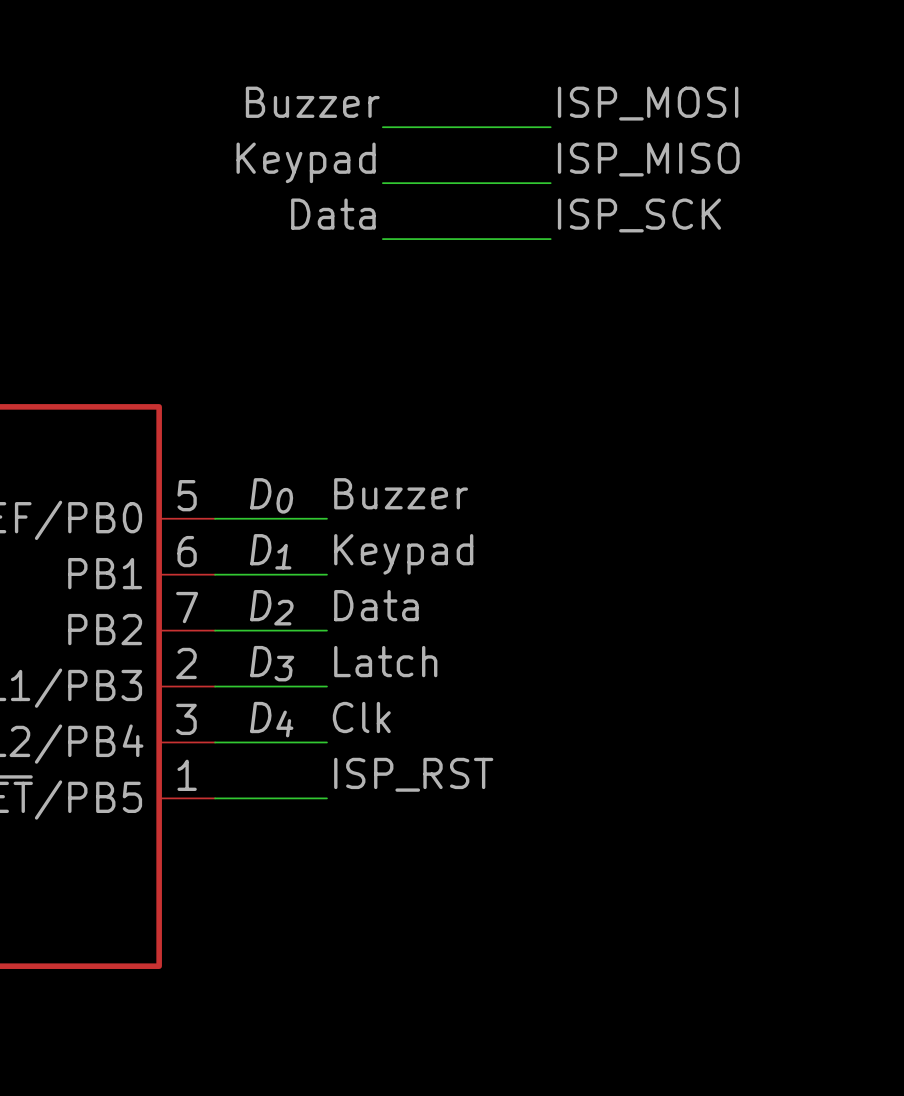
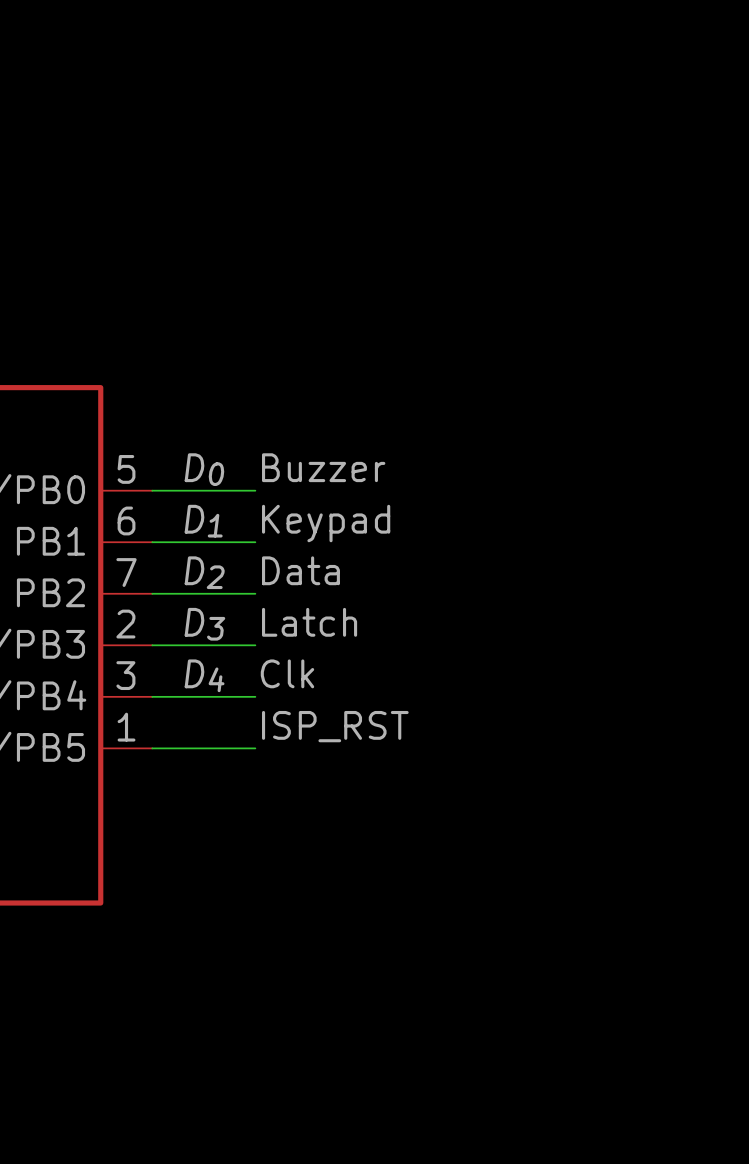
label: Buzzer (312, 102) -> none
label: ISP_MOSI (648, 103) -> none
wire: (382, 127) (550, 127) -> none
label: ISP_MISO (648, 159) -> none
label: Keypad (306, 162) -> none
wire: (382, 183) (550, 183) -> none
label: Data (333, 214) -> none
label: ISP_SCK (639, 215) -> none
wire: (382, 239) (550, 239) -> none

